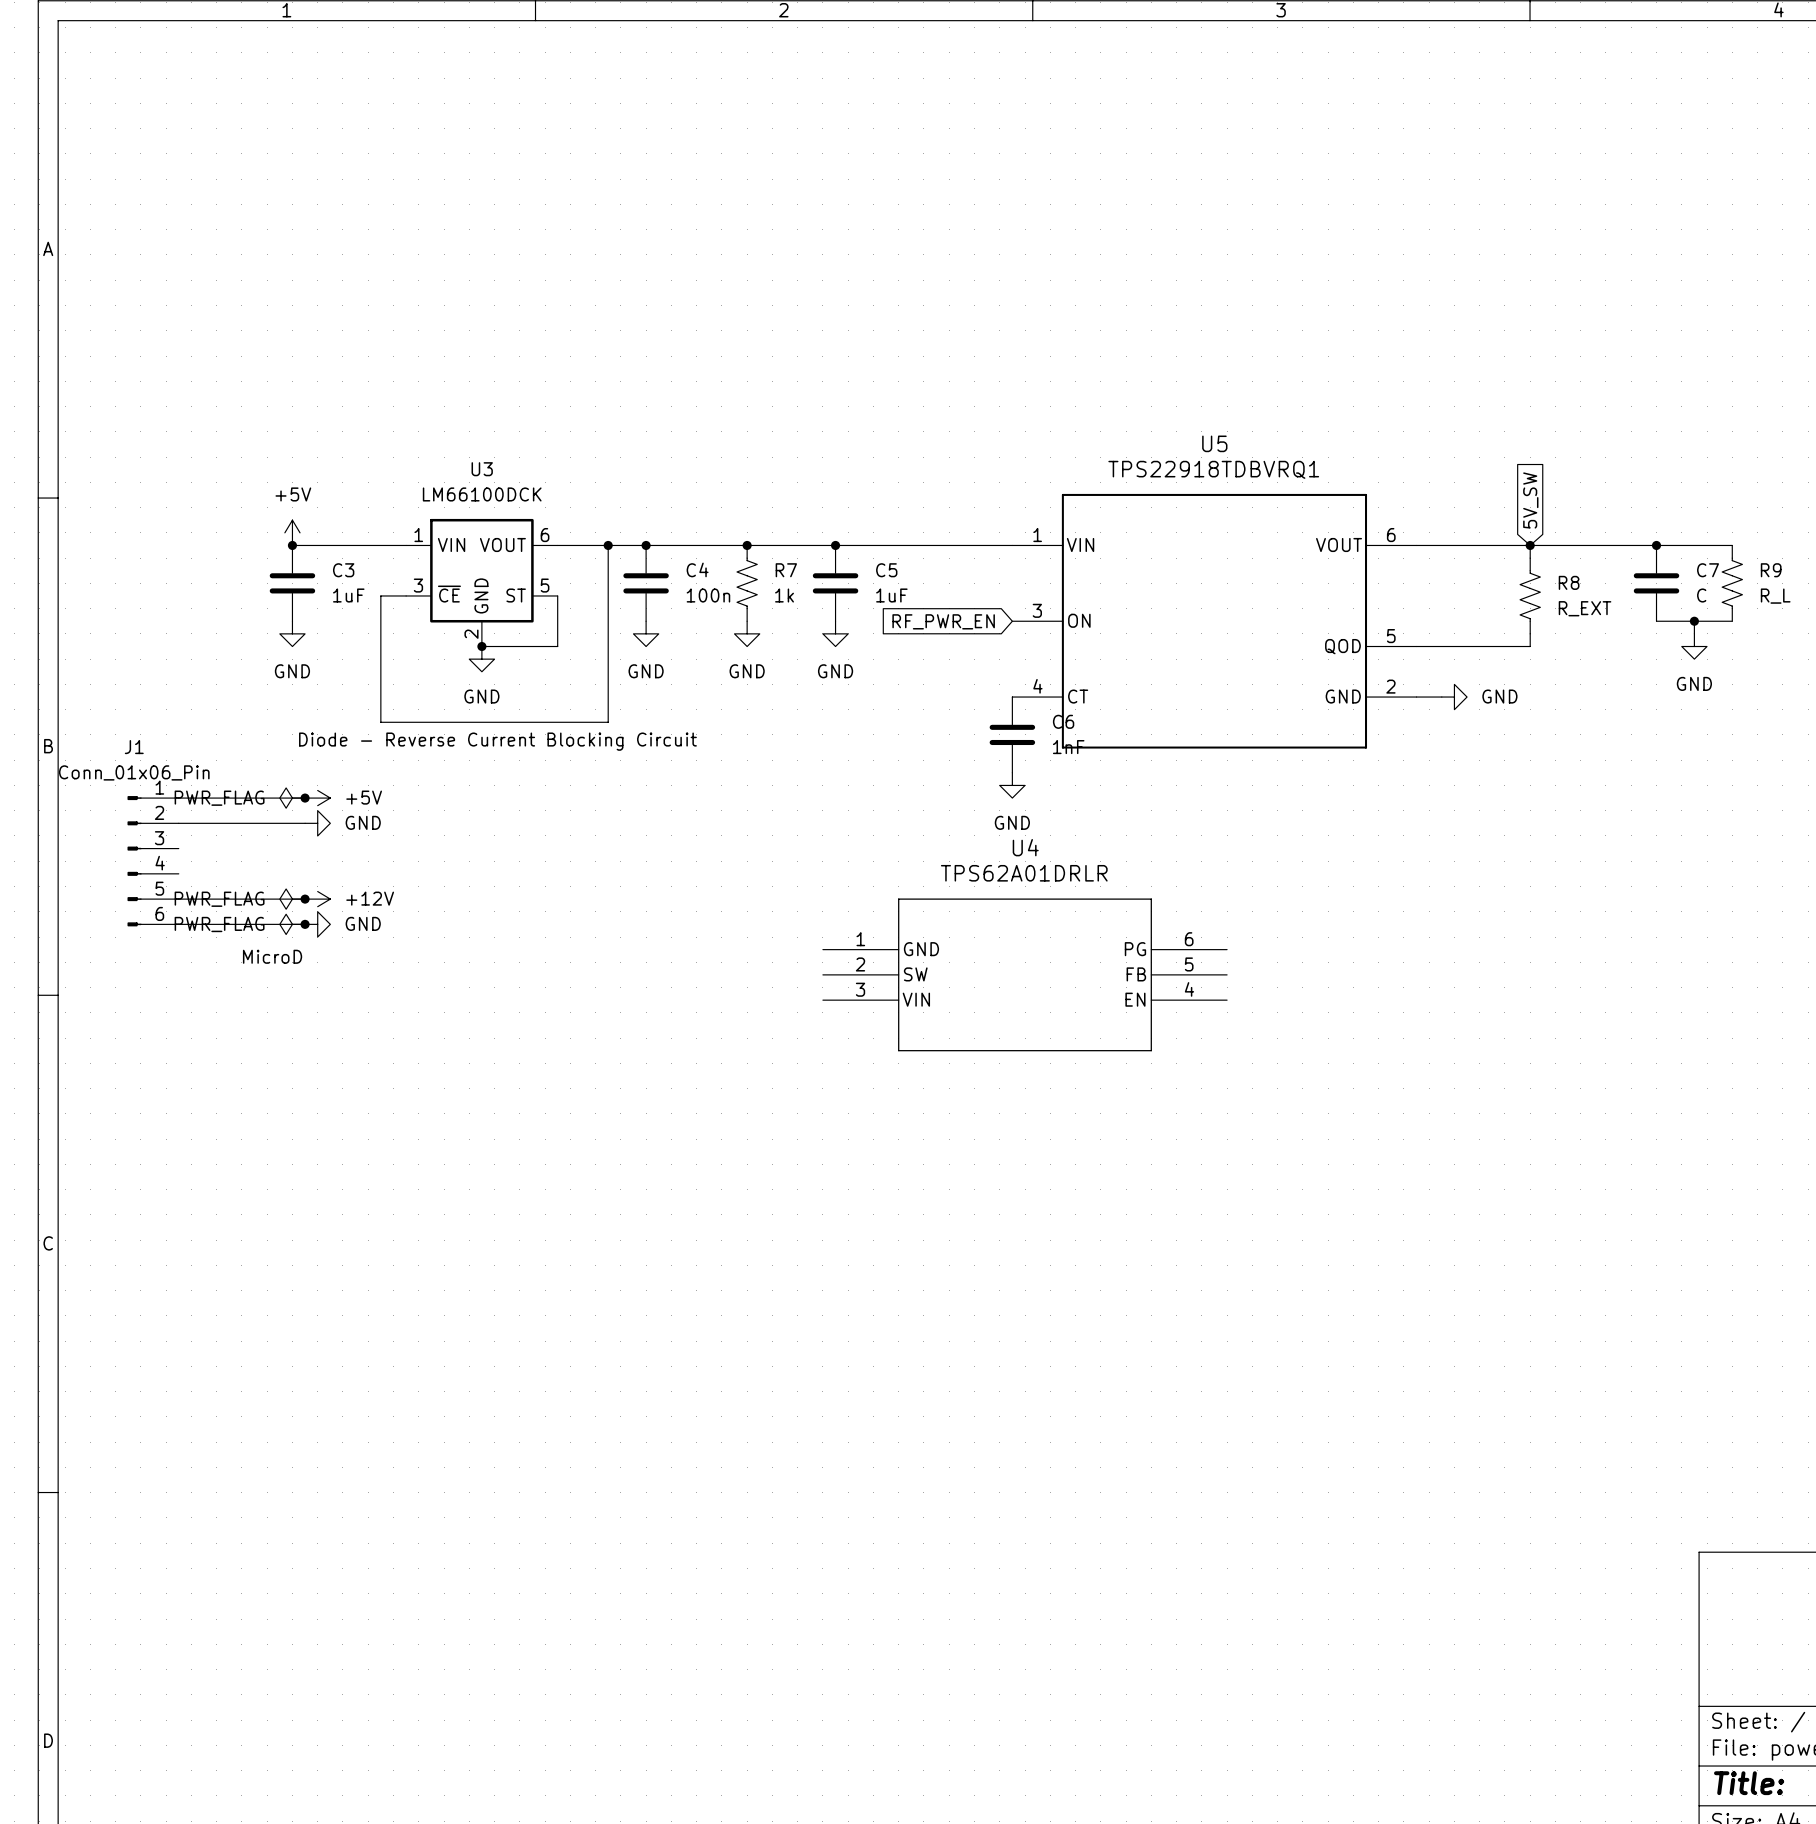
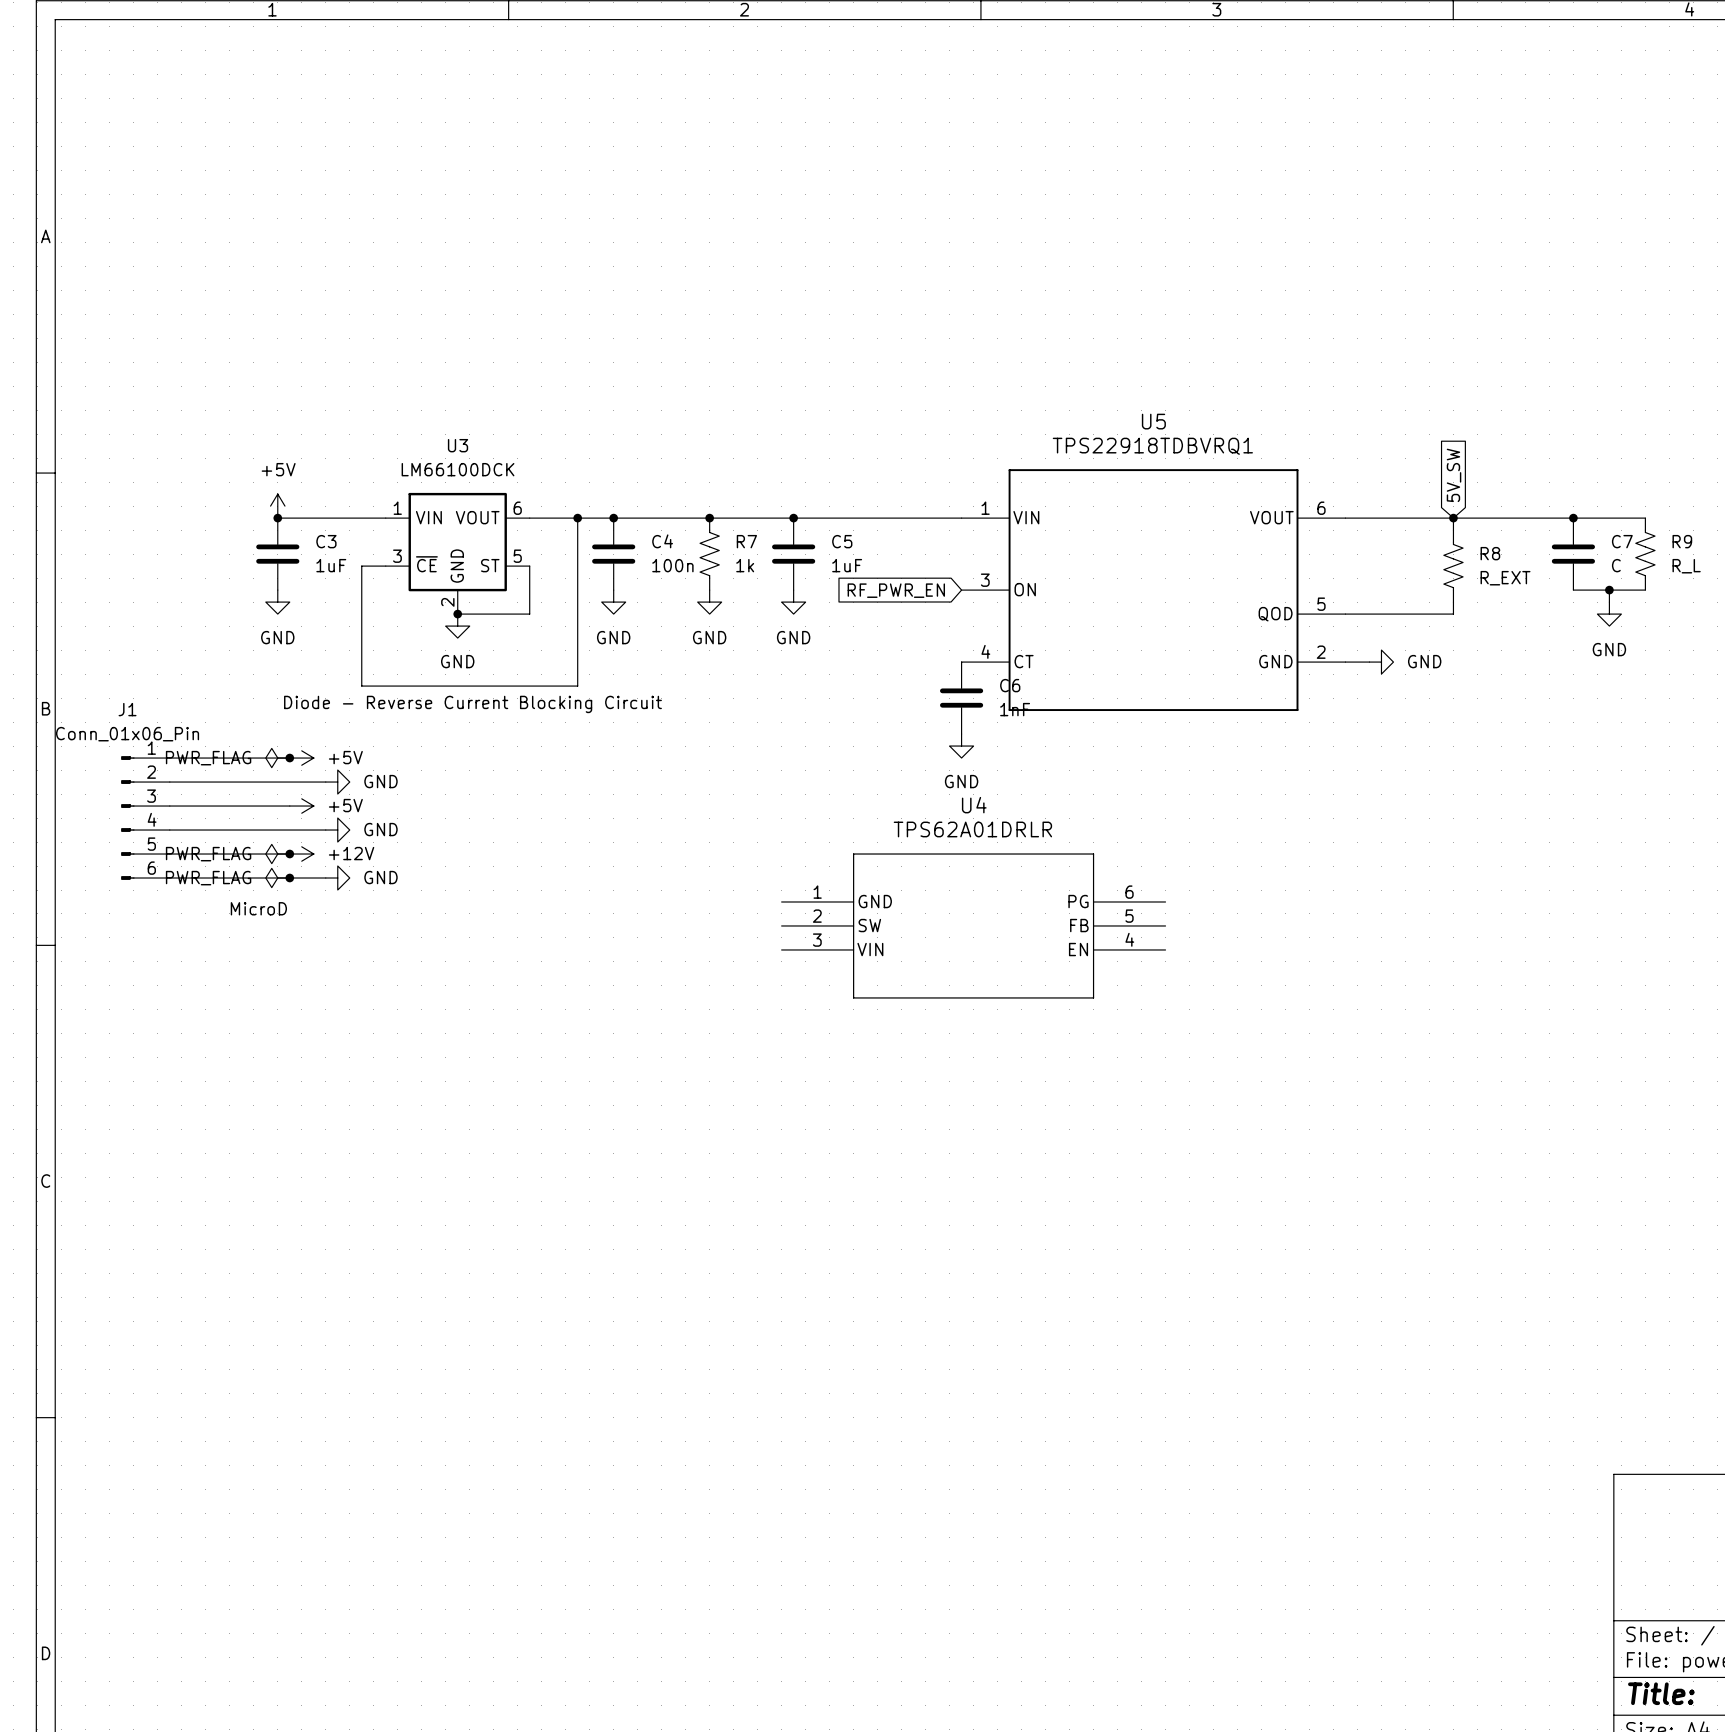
wire: none -> (289, 782) (325, 782)
power symbol: GND (317, 823) -> none
power symbol: none -> GND (337, 782)
wire: none -> (169, 806) (289, 806)
power symbol: none -> +5V (301, 806)
wire: none -> (169, 830) (325, 830)
power symbol: none -> GND (337, 830)
wire: none -> (289, 878) (325, 878)
power symbol: GND (317, 924) -> none
power symbol: none -> GND (337, 878)

